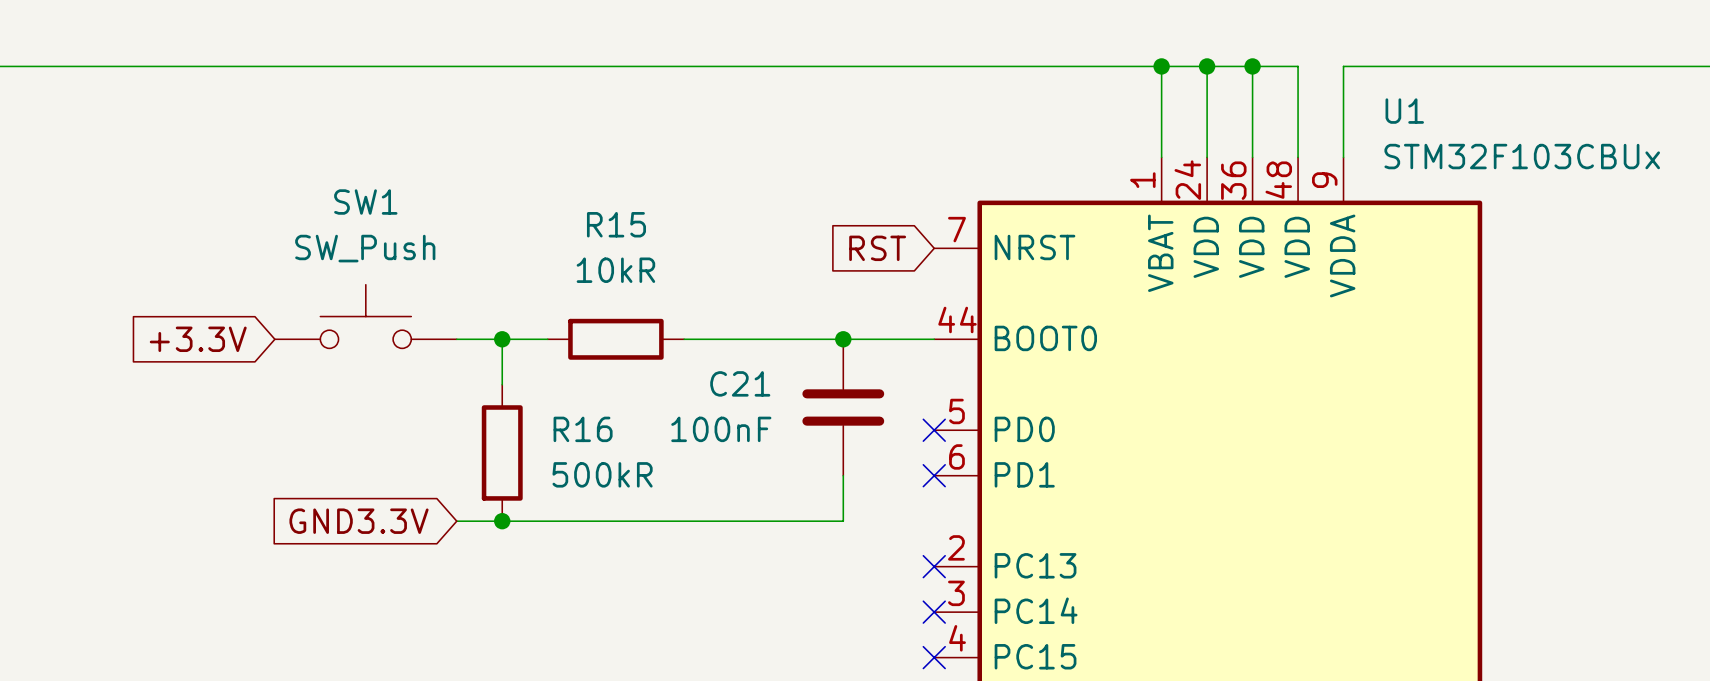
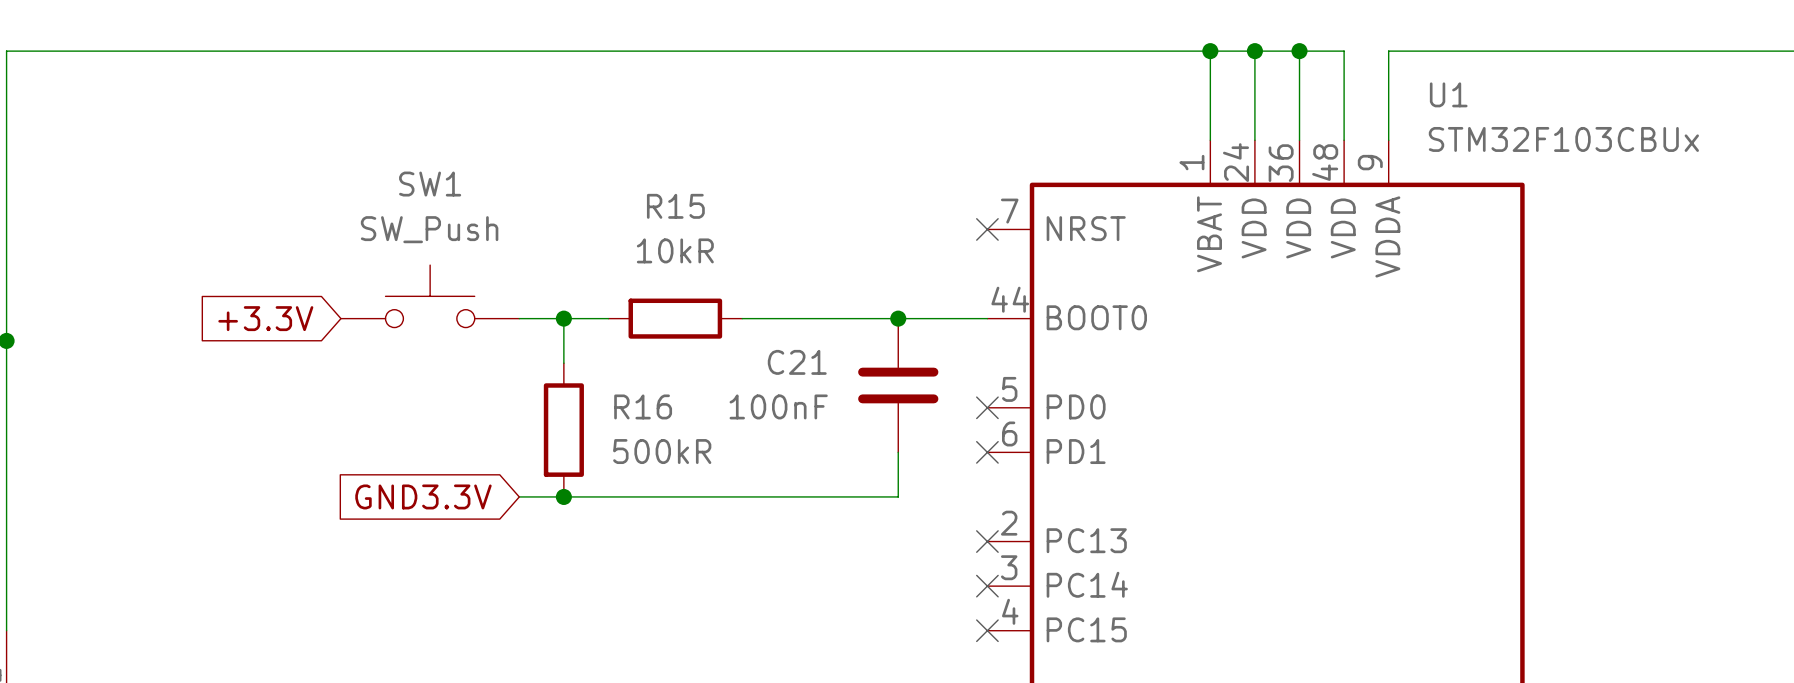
global label: RST (877, 248) -> none
no-connect mark: none -> (987, 229)

